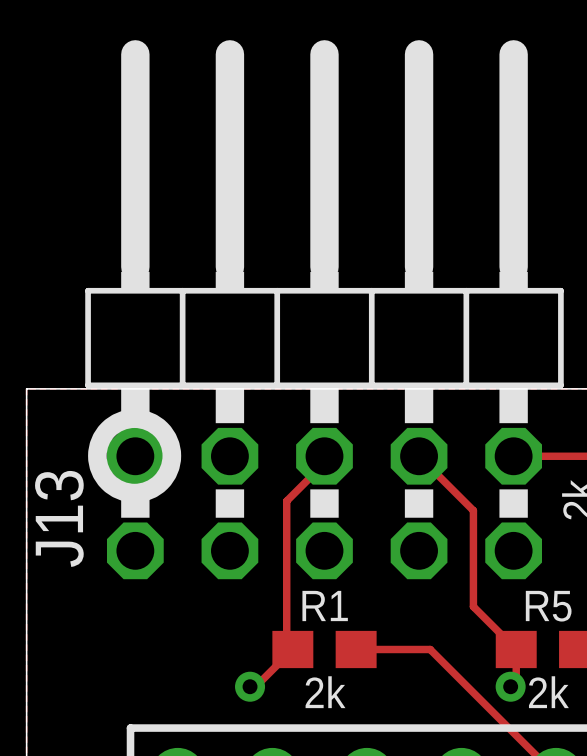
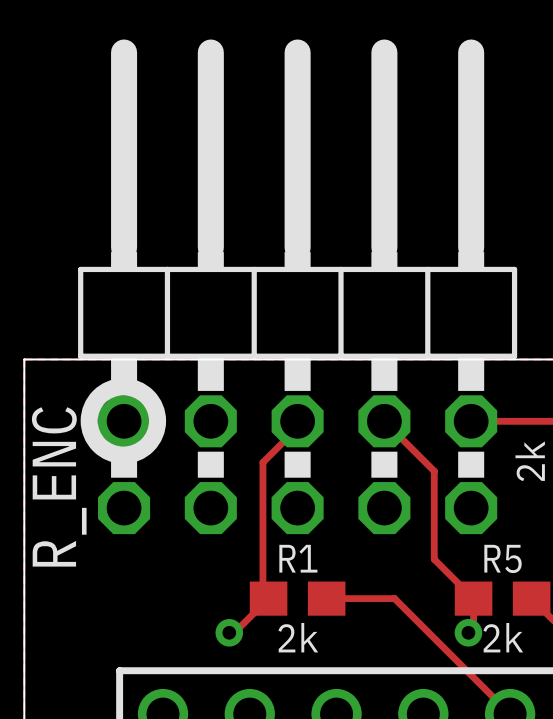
J13 name: J13 (59, 518) -> R_ENC (59, 486)

